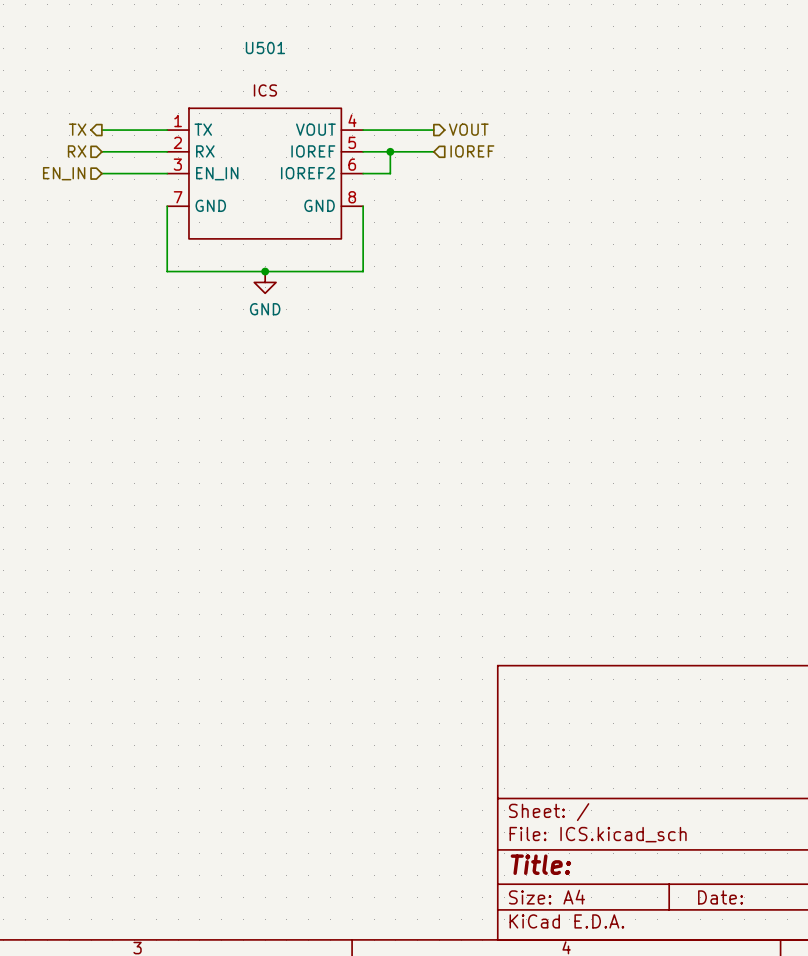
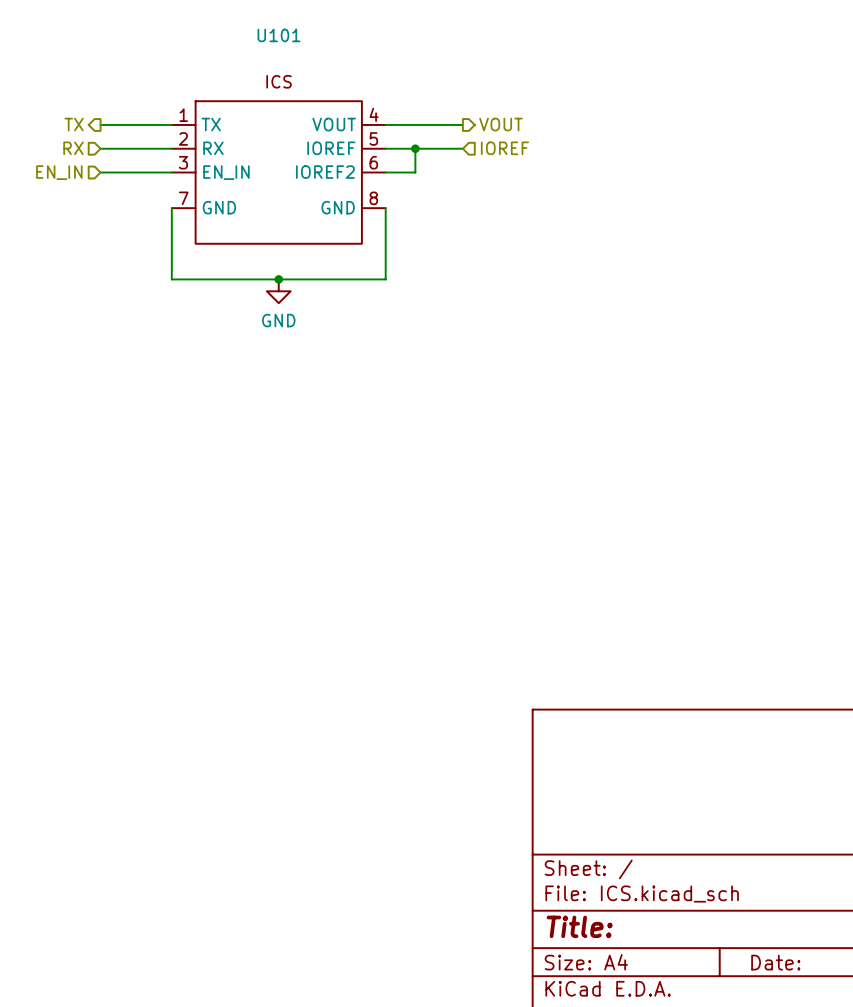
U501 name: U501 (265, 48) -> U101 (279, 35)

